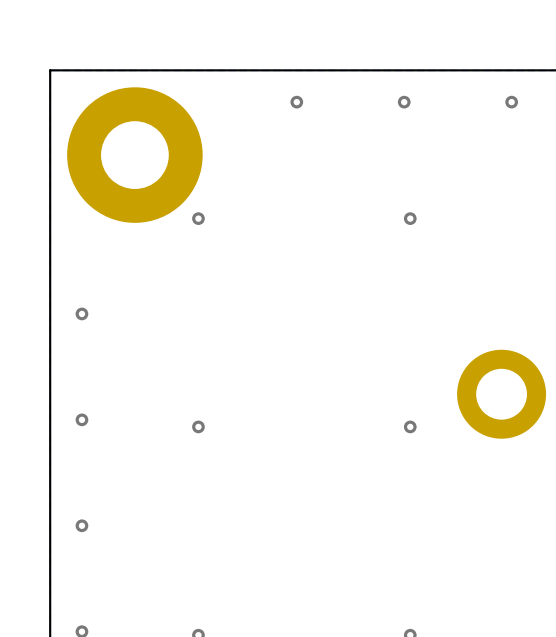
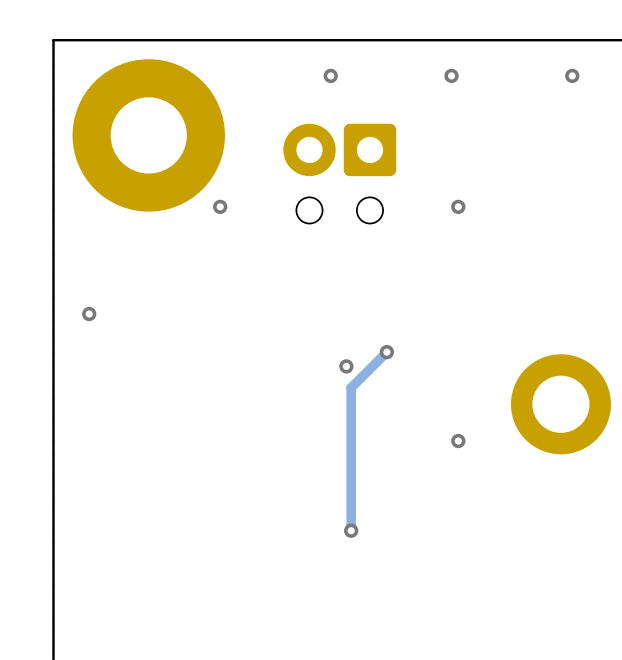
part: none -> (339, 173)
track: none -> (386, 352) (351, 387) (351, 530)
via: none -> (386, 352)
via: none -> (346, 366)
via: (81, 419) -> none
via: (198, 426) -> none
via: none -> (351, 530)
via: (81, 525) -> none

